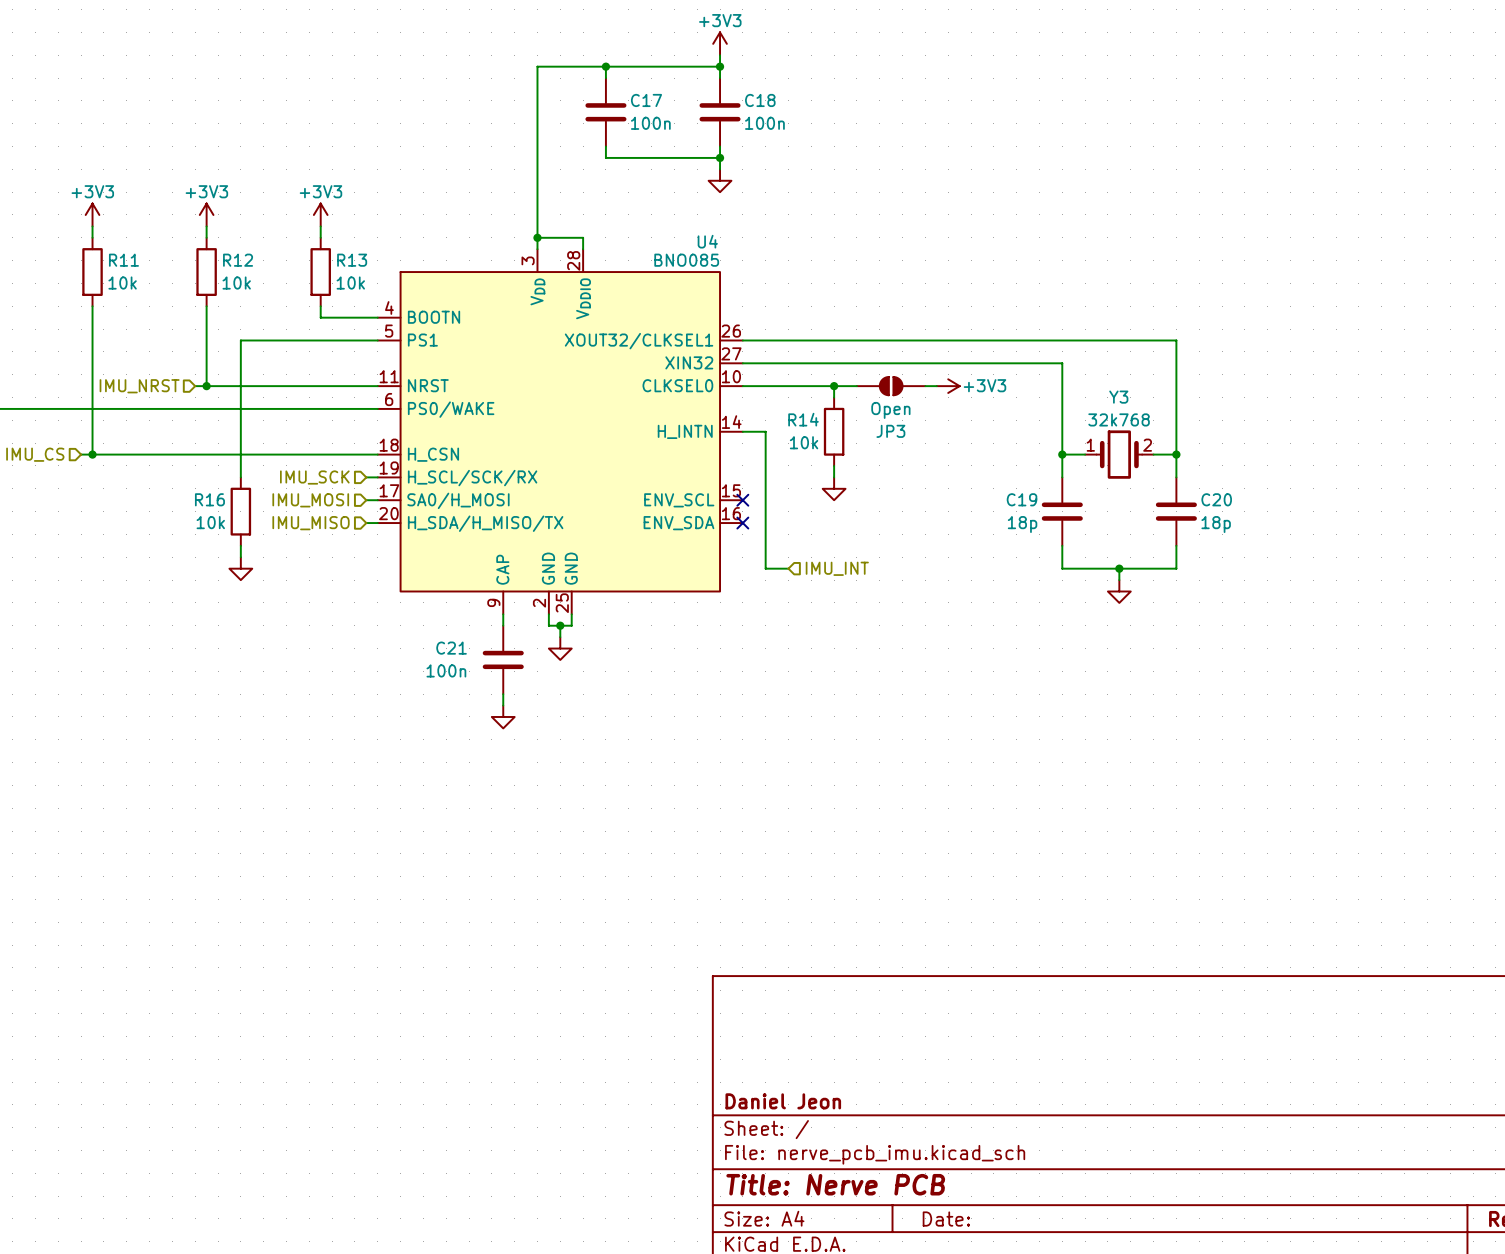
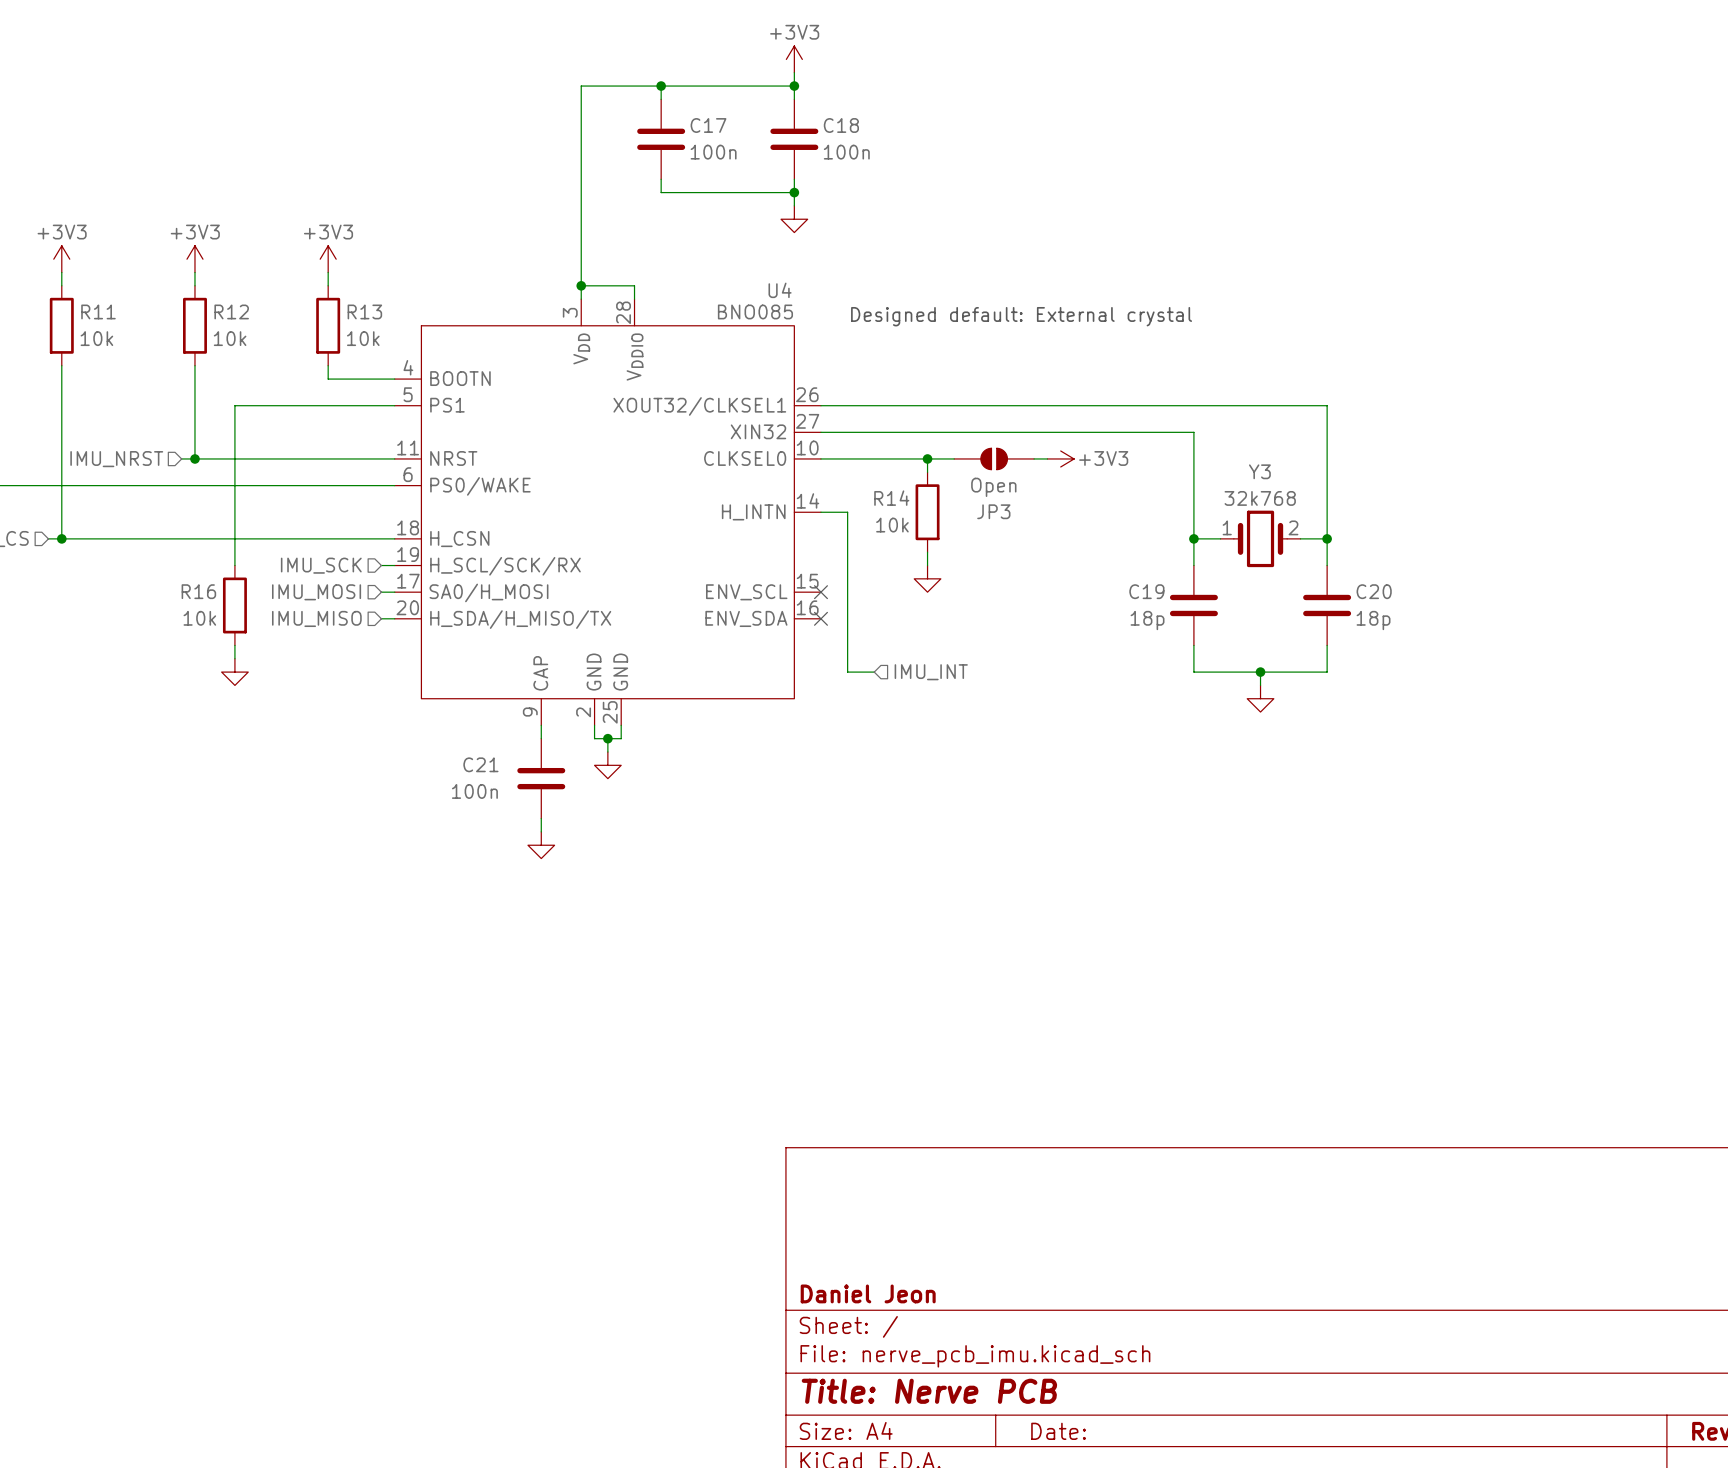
text: none -> Designed default: External crystal (1021, 316)

